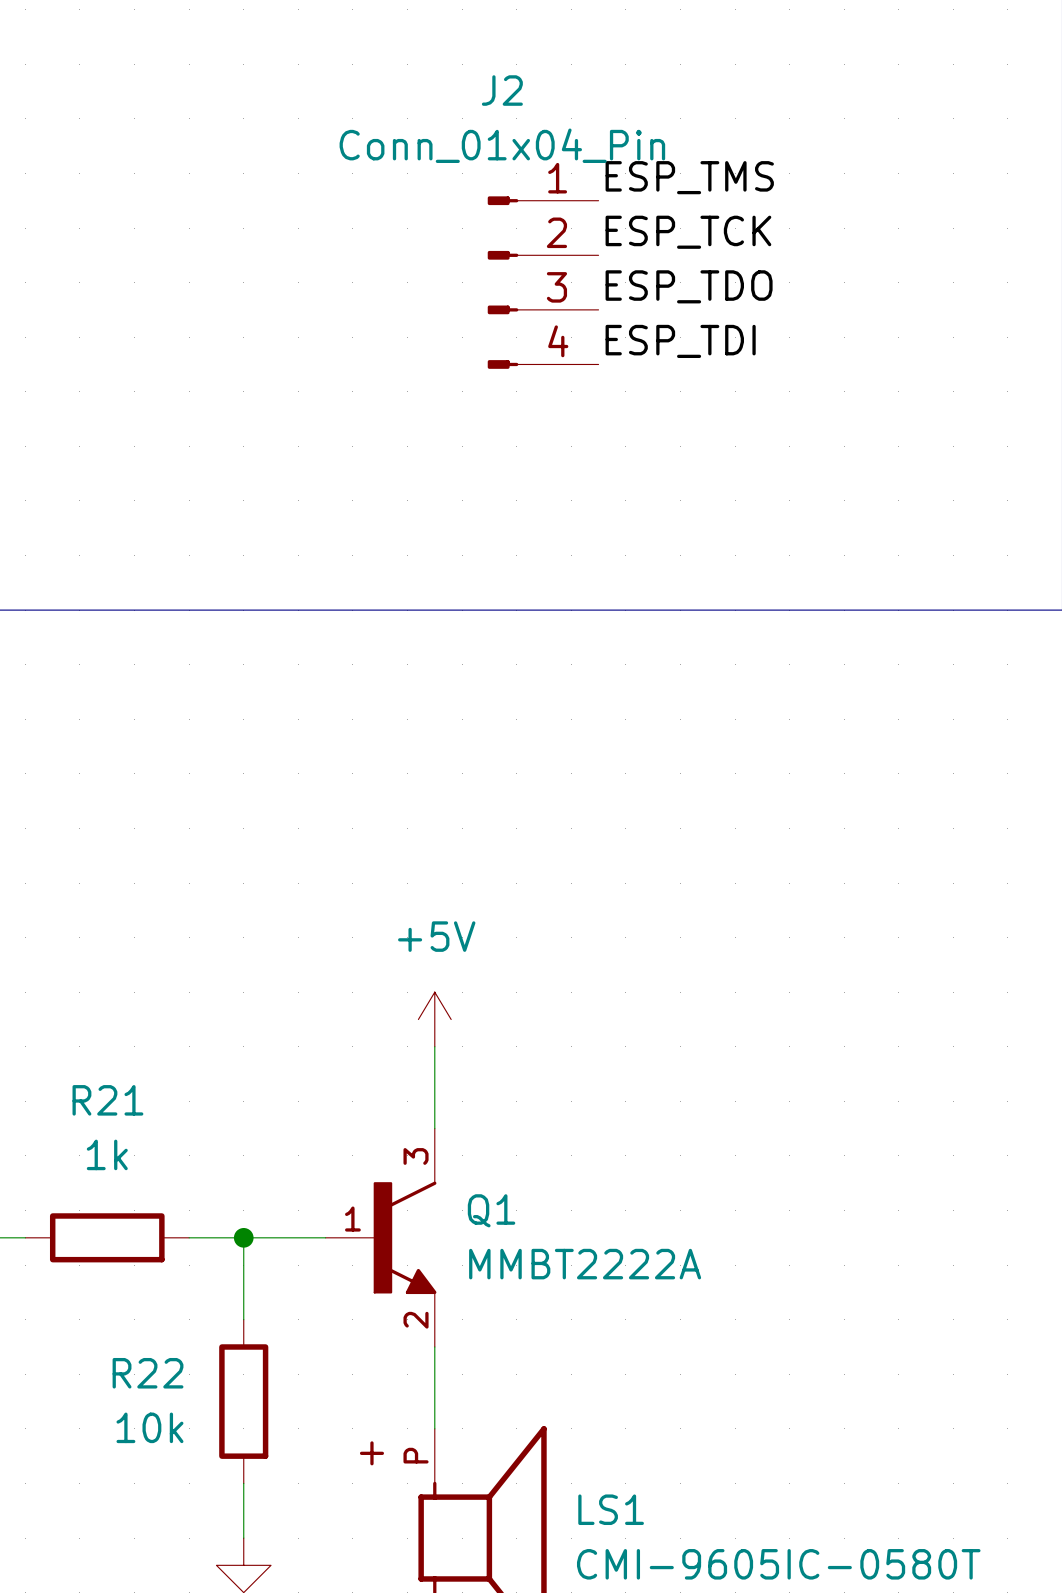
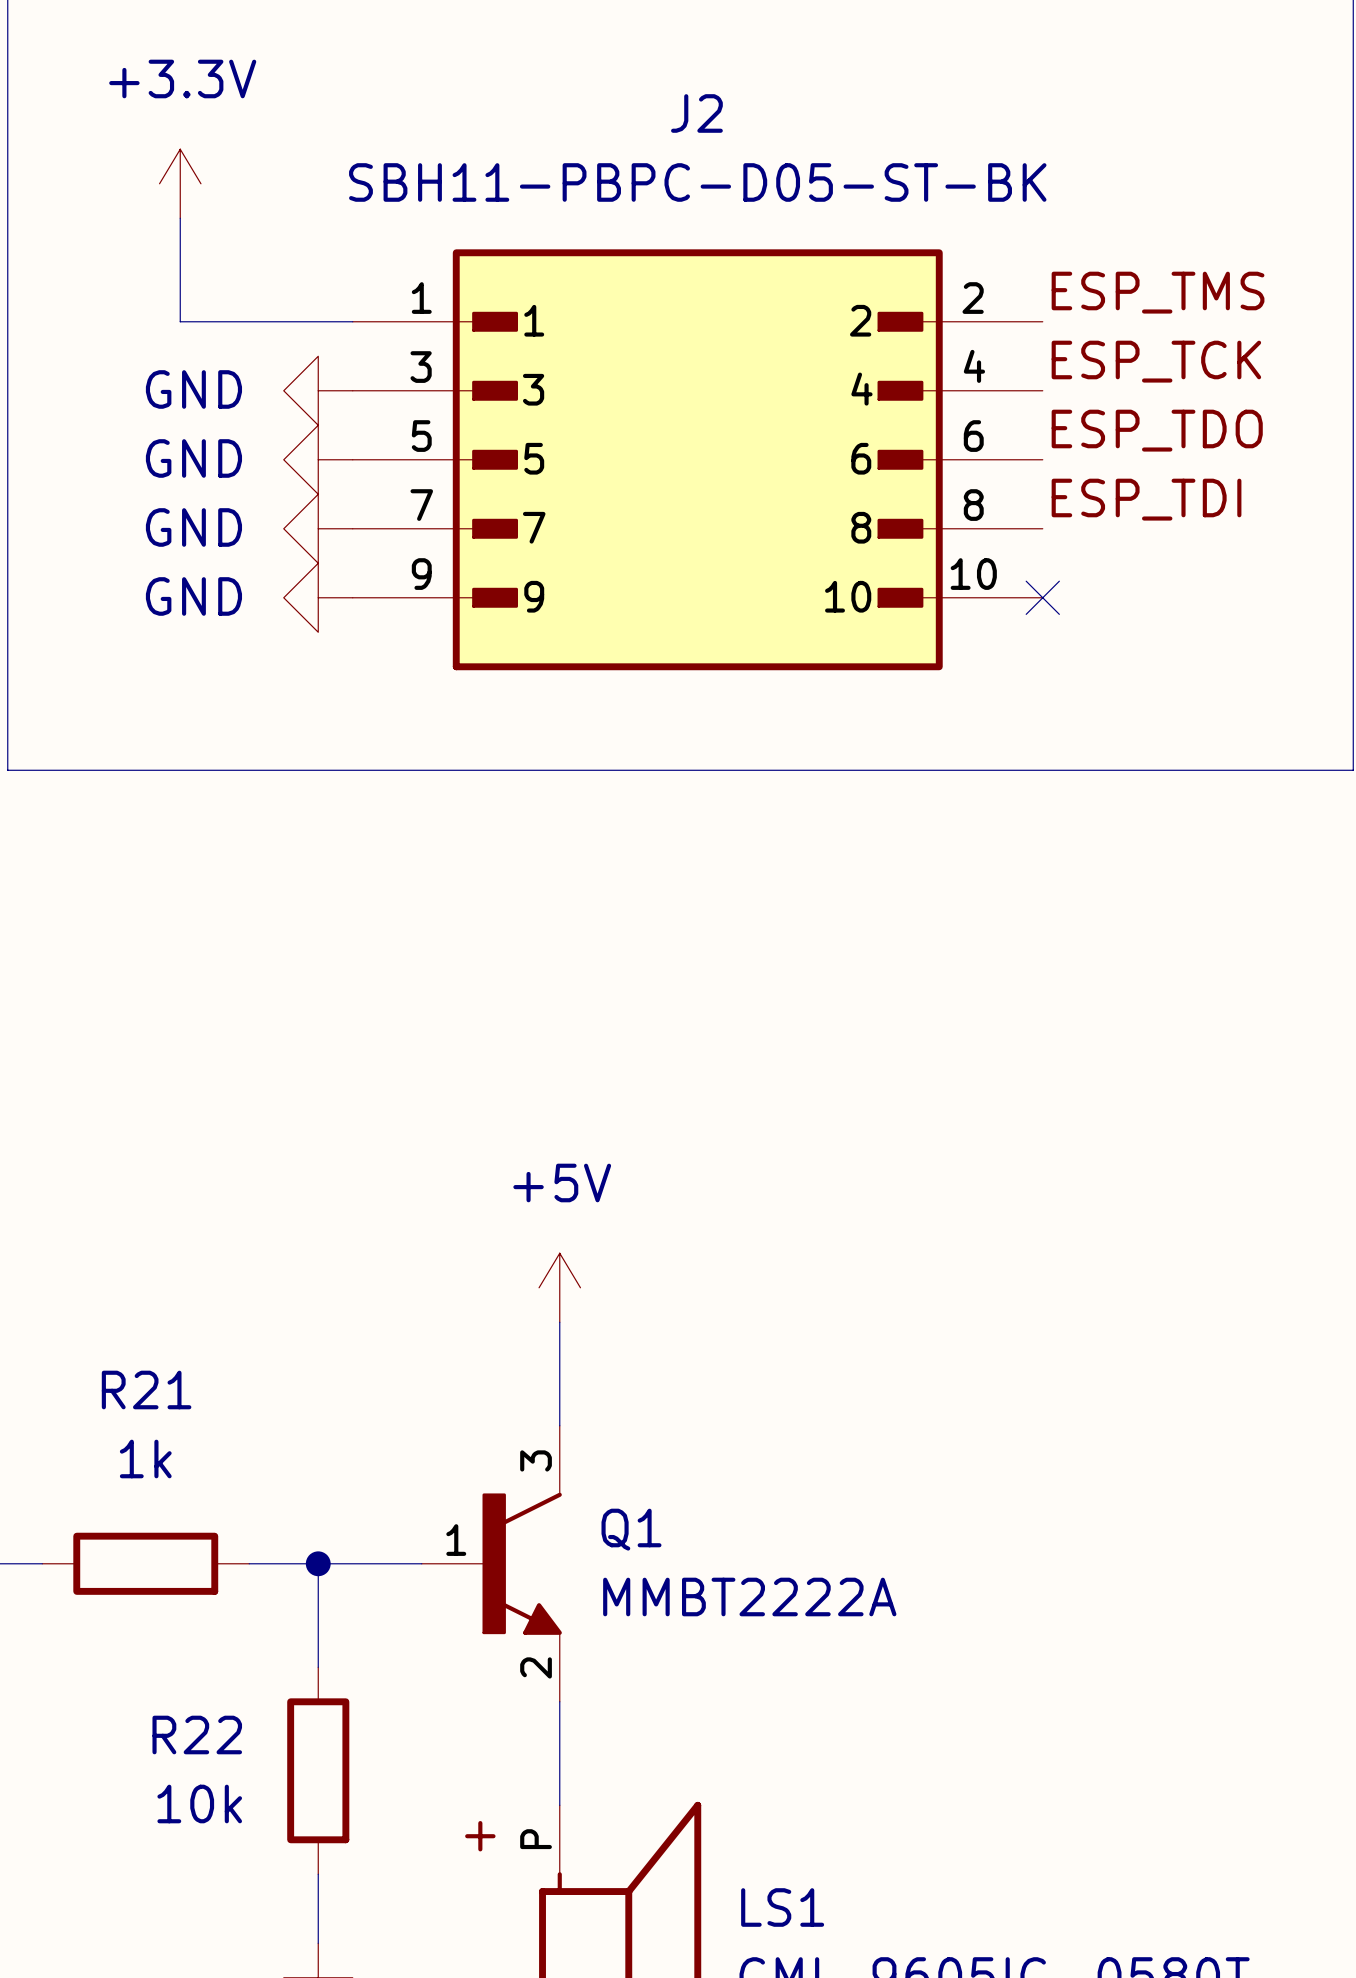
J2 name position: J2 (502, 90) -> J2 (696, 113)
J2 value: Conn_01x04_Pin (502, 145) -> SBH11-PBPC-D05-ST-BK (697, 182)
power symbol: none -> +3.3V (180, 183)
wire: none -> (180, 218) (180, 321) (352, 321)
label position: ESP_TMS (689, 177) -> ESP_TMS (1158, 292)
J2 symbol: [487, 196, 599, 369] -> [352, 249, 1043, 671]
label position: ESP_TCK (688, 232) -> ESP_TCK (1156, 361)
label position: ESP_TDO (689, 286) -> ESP_TDO (1157, 430)
power symbol: none -> GND (318, 390)
label position: ESP_TDI (680, 341) -> ESP_TDI (1146, 499)
power symbol: none -> GND (318, 459)
power symbol: none -> GND (318, 528)
power symbol: none -> GND (318, 597)
no-connect mark: none -> (1042, 597)

